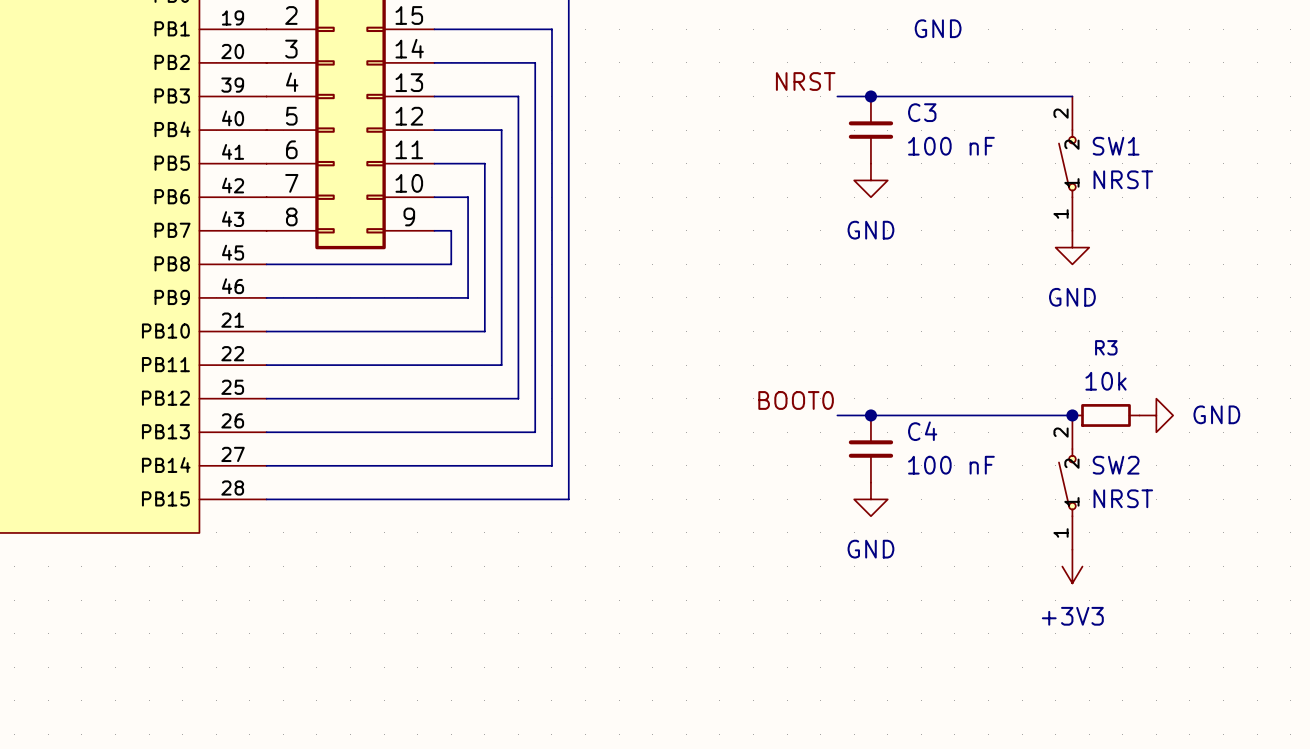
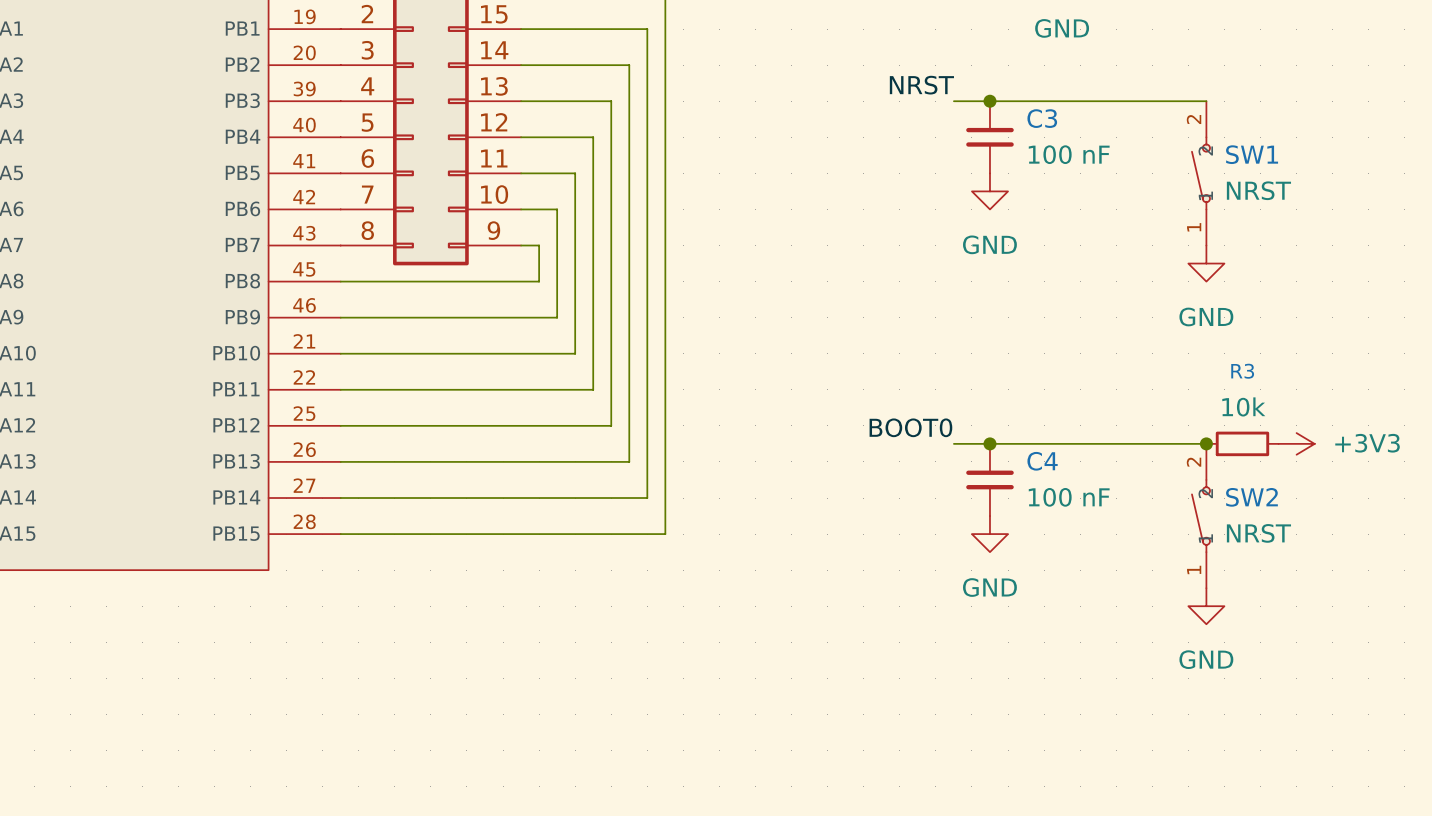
power symbol: GND (1156, 415) -> +3V3 (1296, 443)
power symbol: +3V3 (1072, 566) -> GND (1206, 606)

